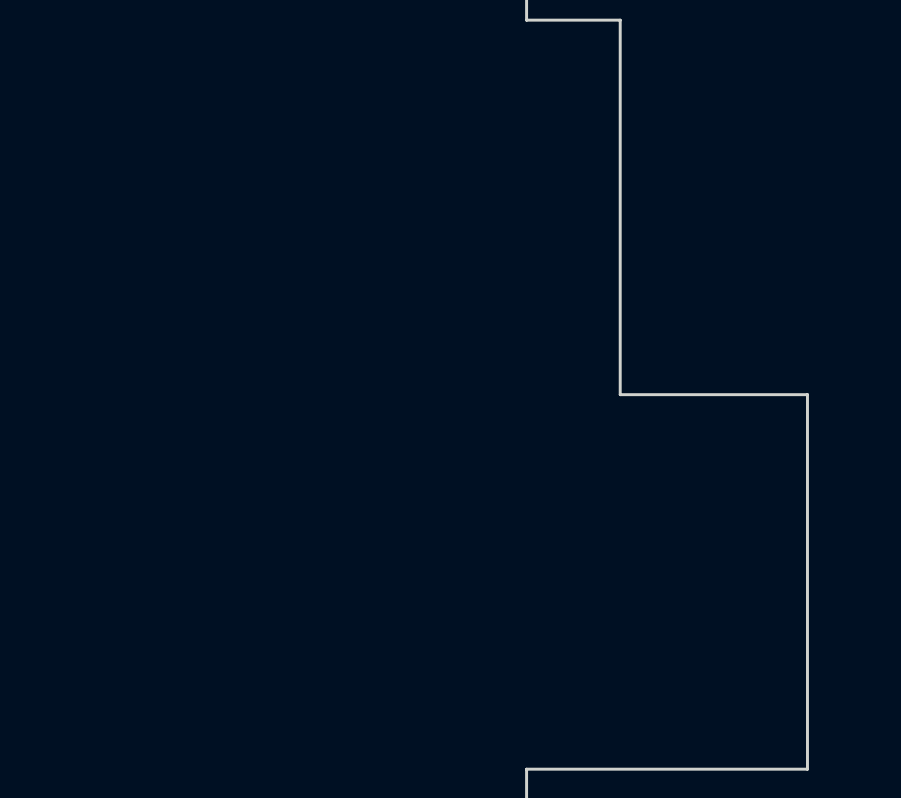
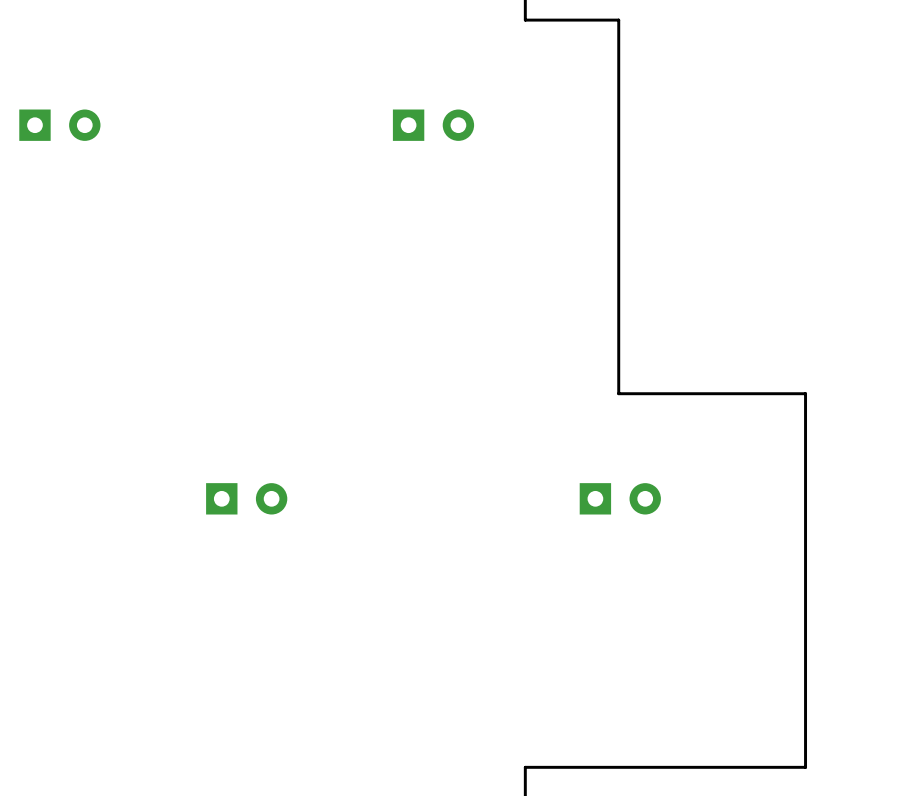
part: none -> (59, 125)
part: none -> (433, 125)
part: none -> (246, 498)
part: none -> (620, 498)

